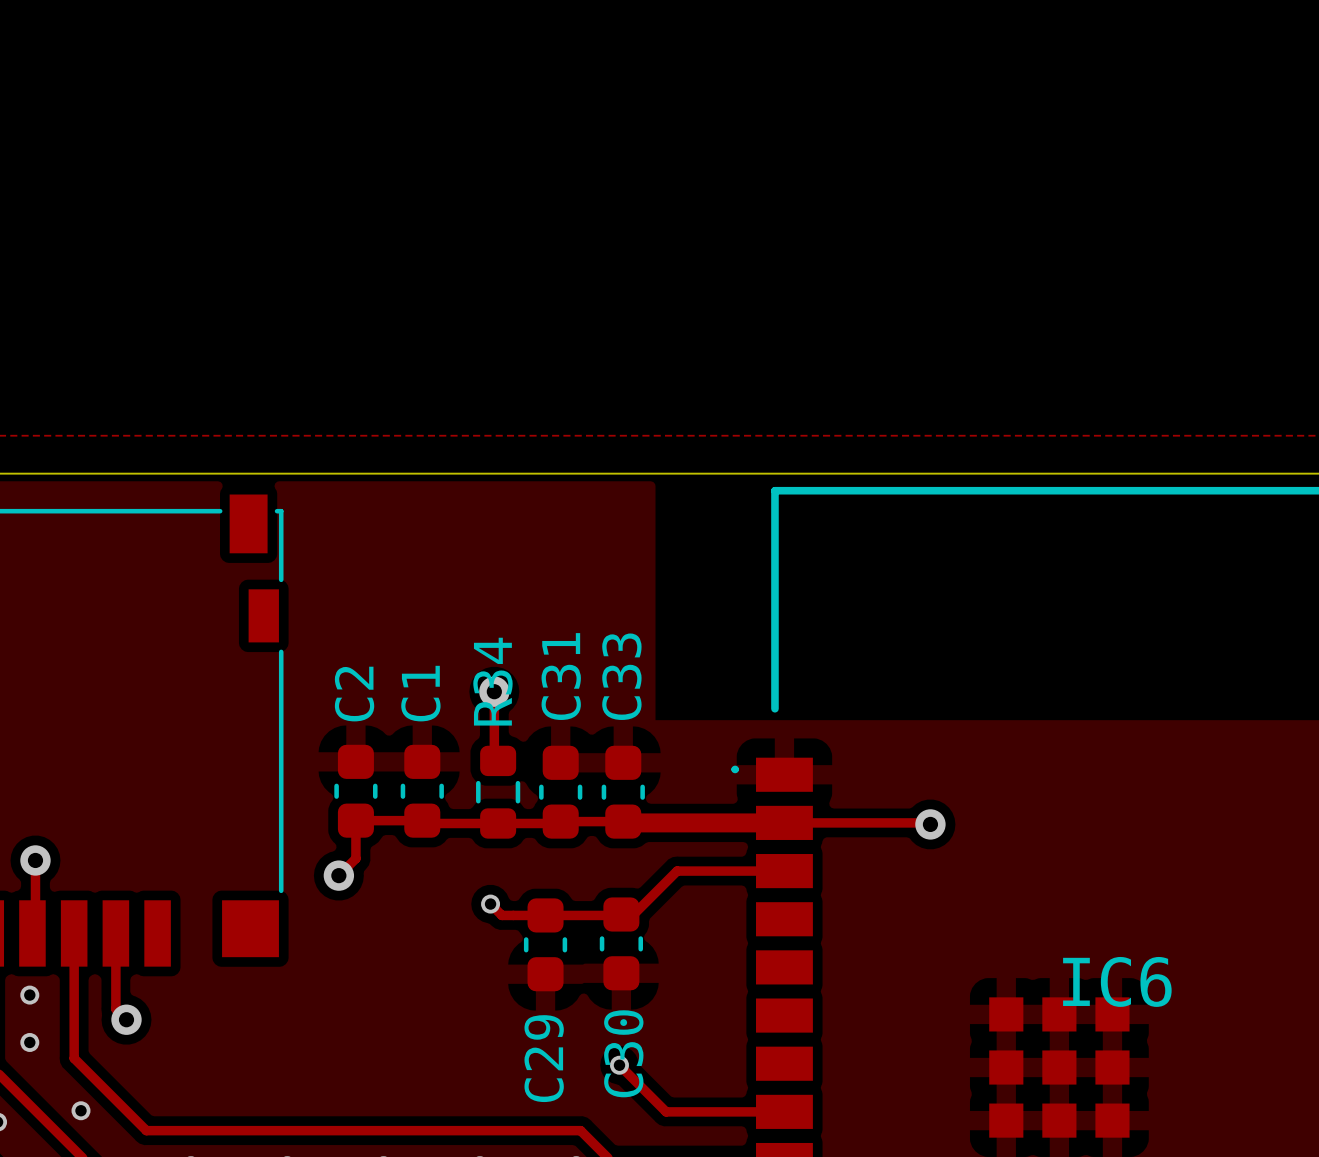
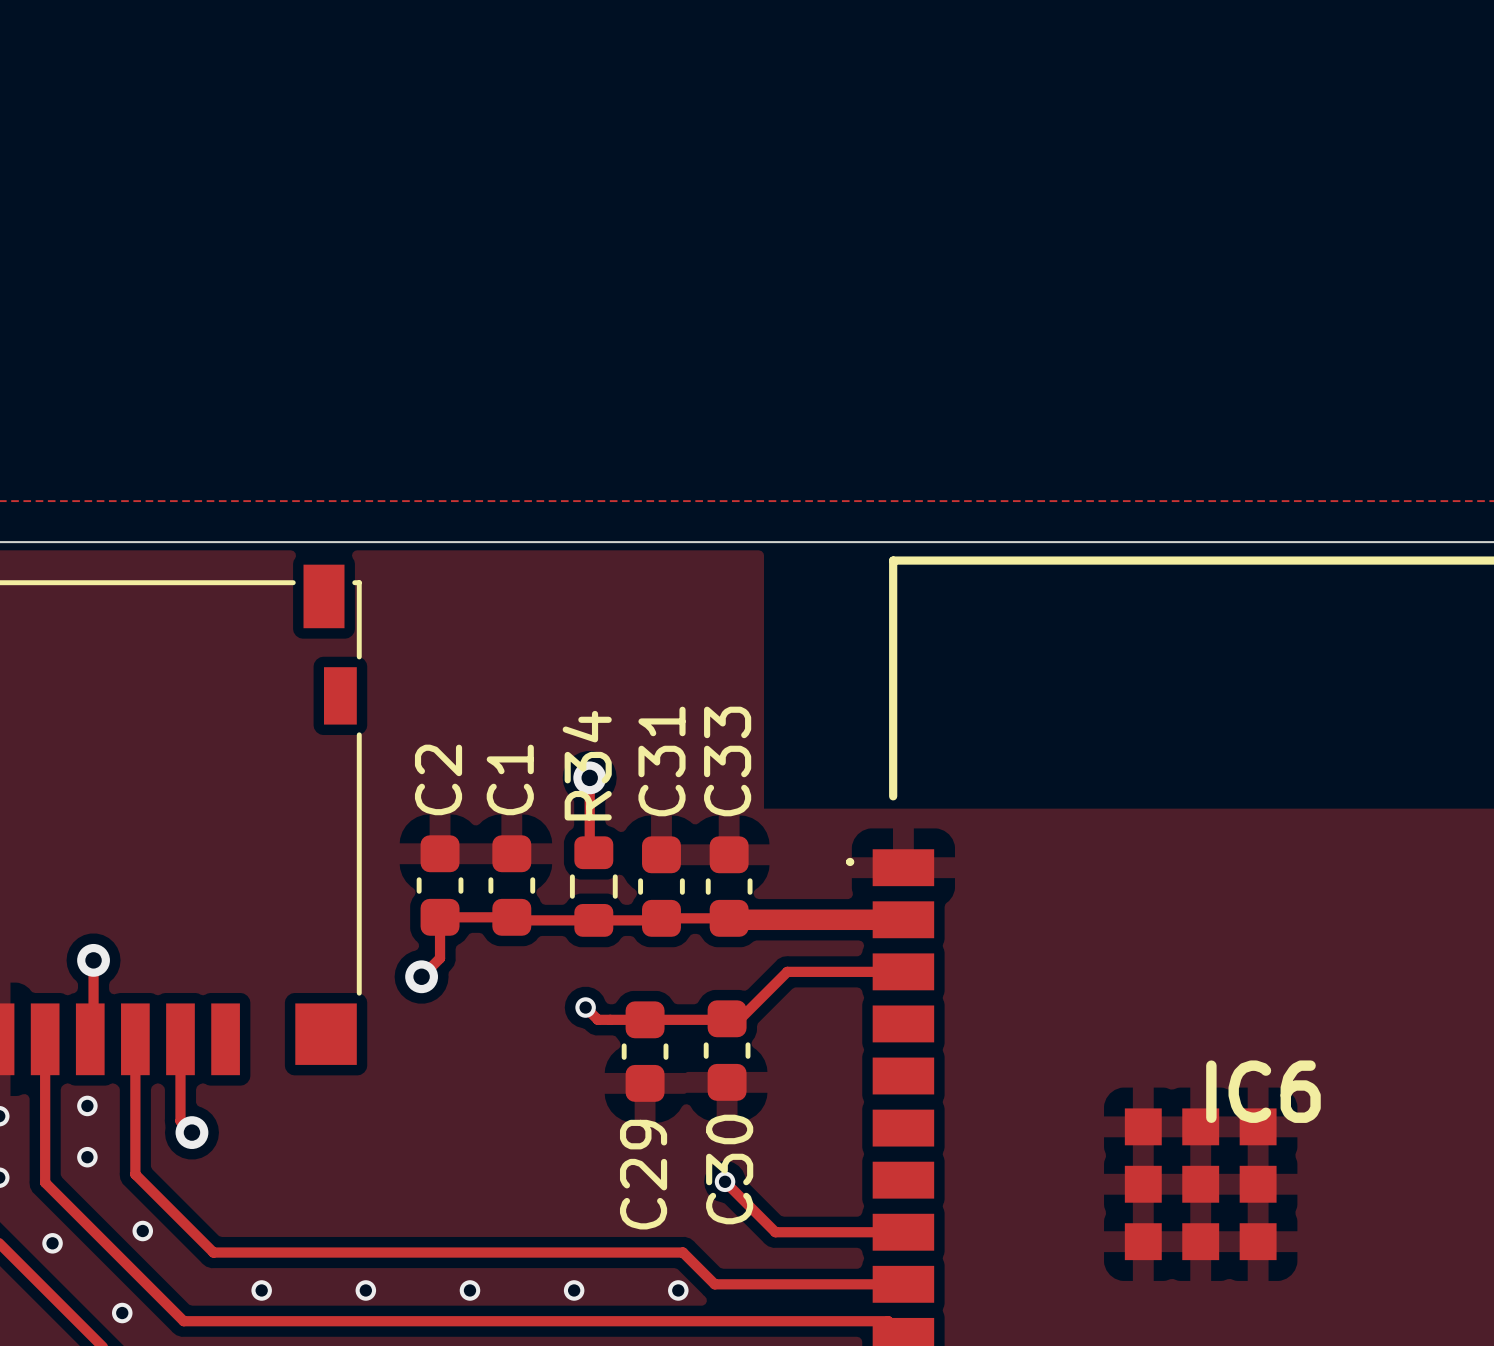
track: (784, 822) (928, 822) (930, 824) -> none
via: (930, 824) -> none

